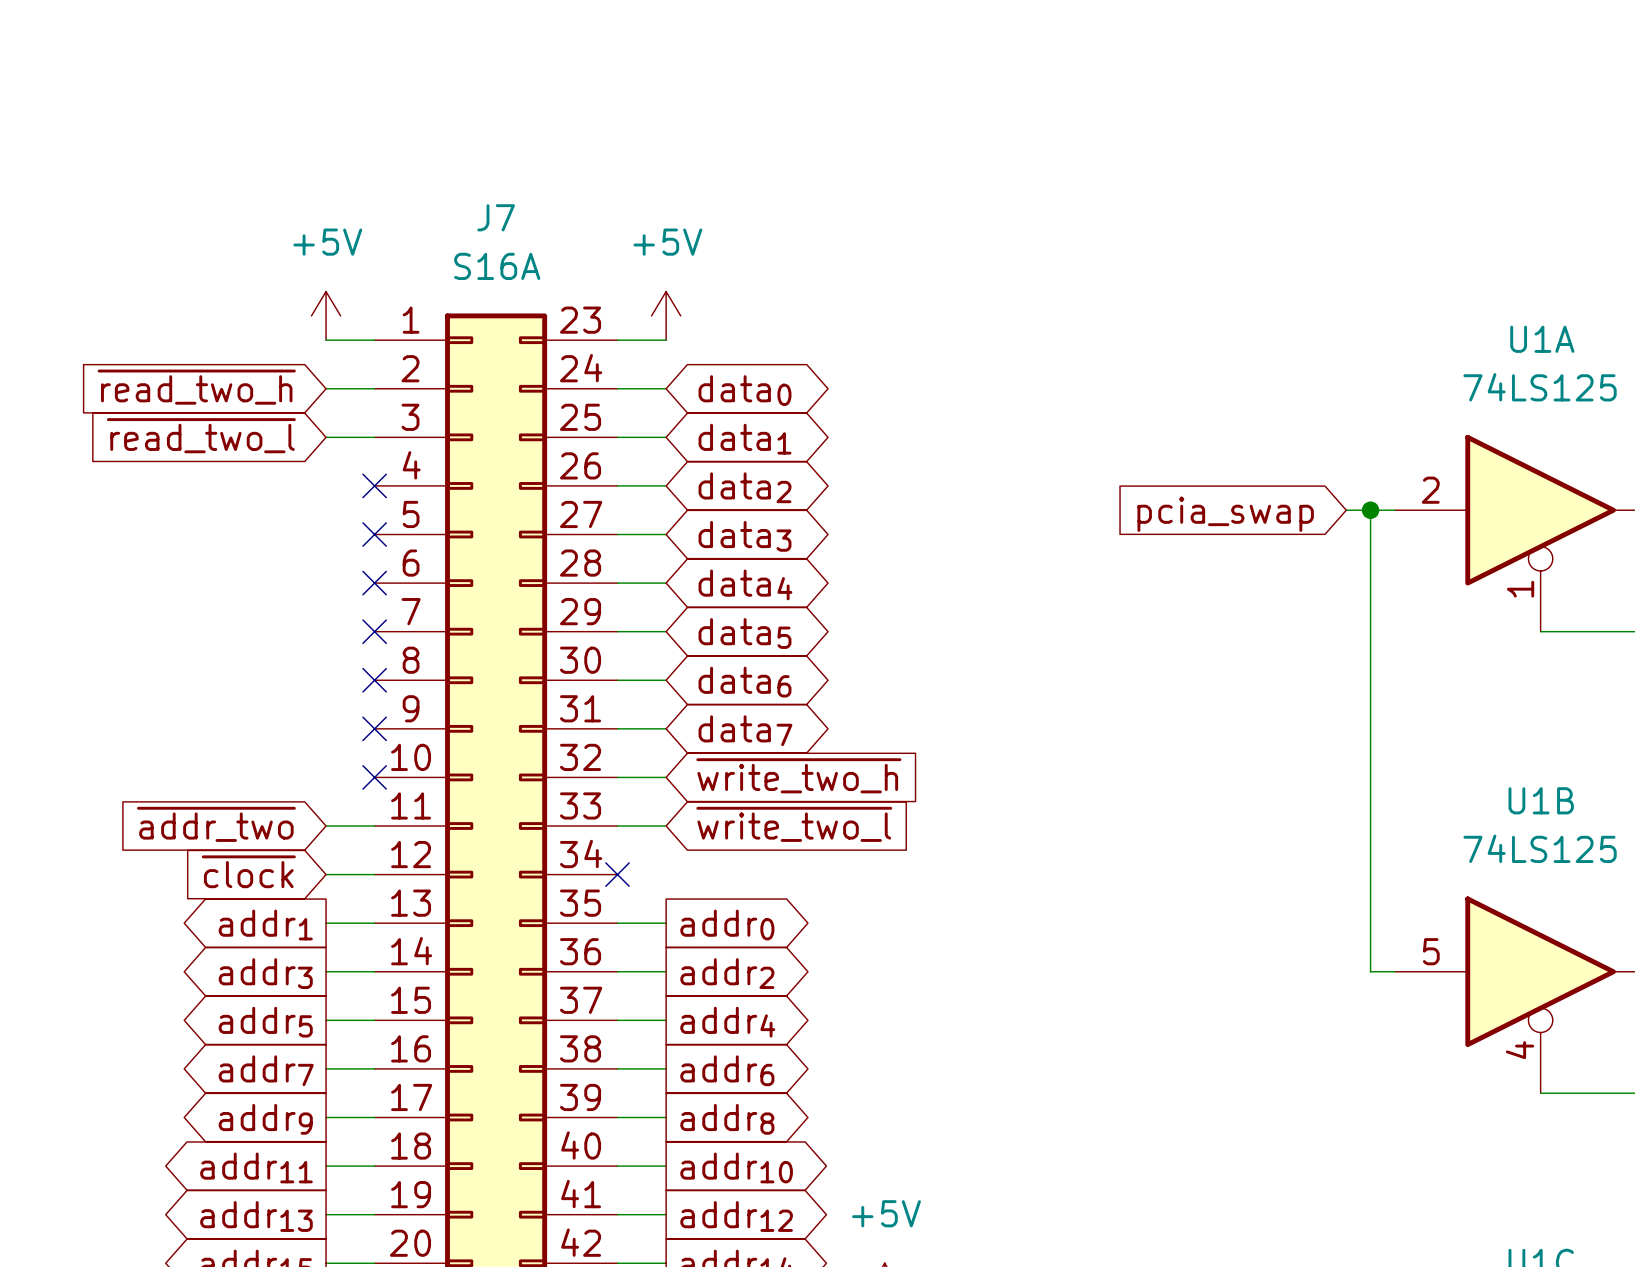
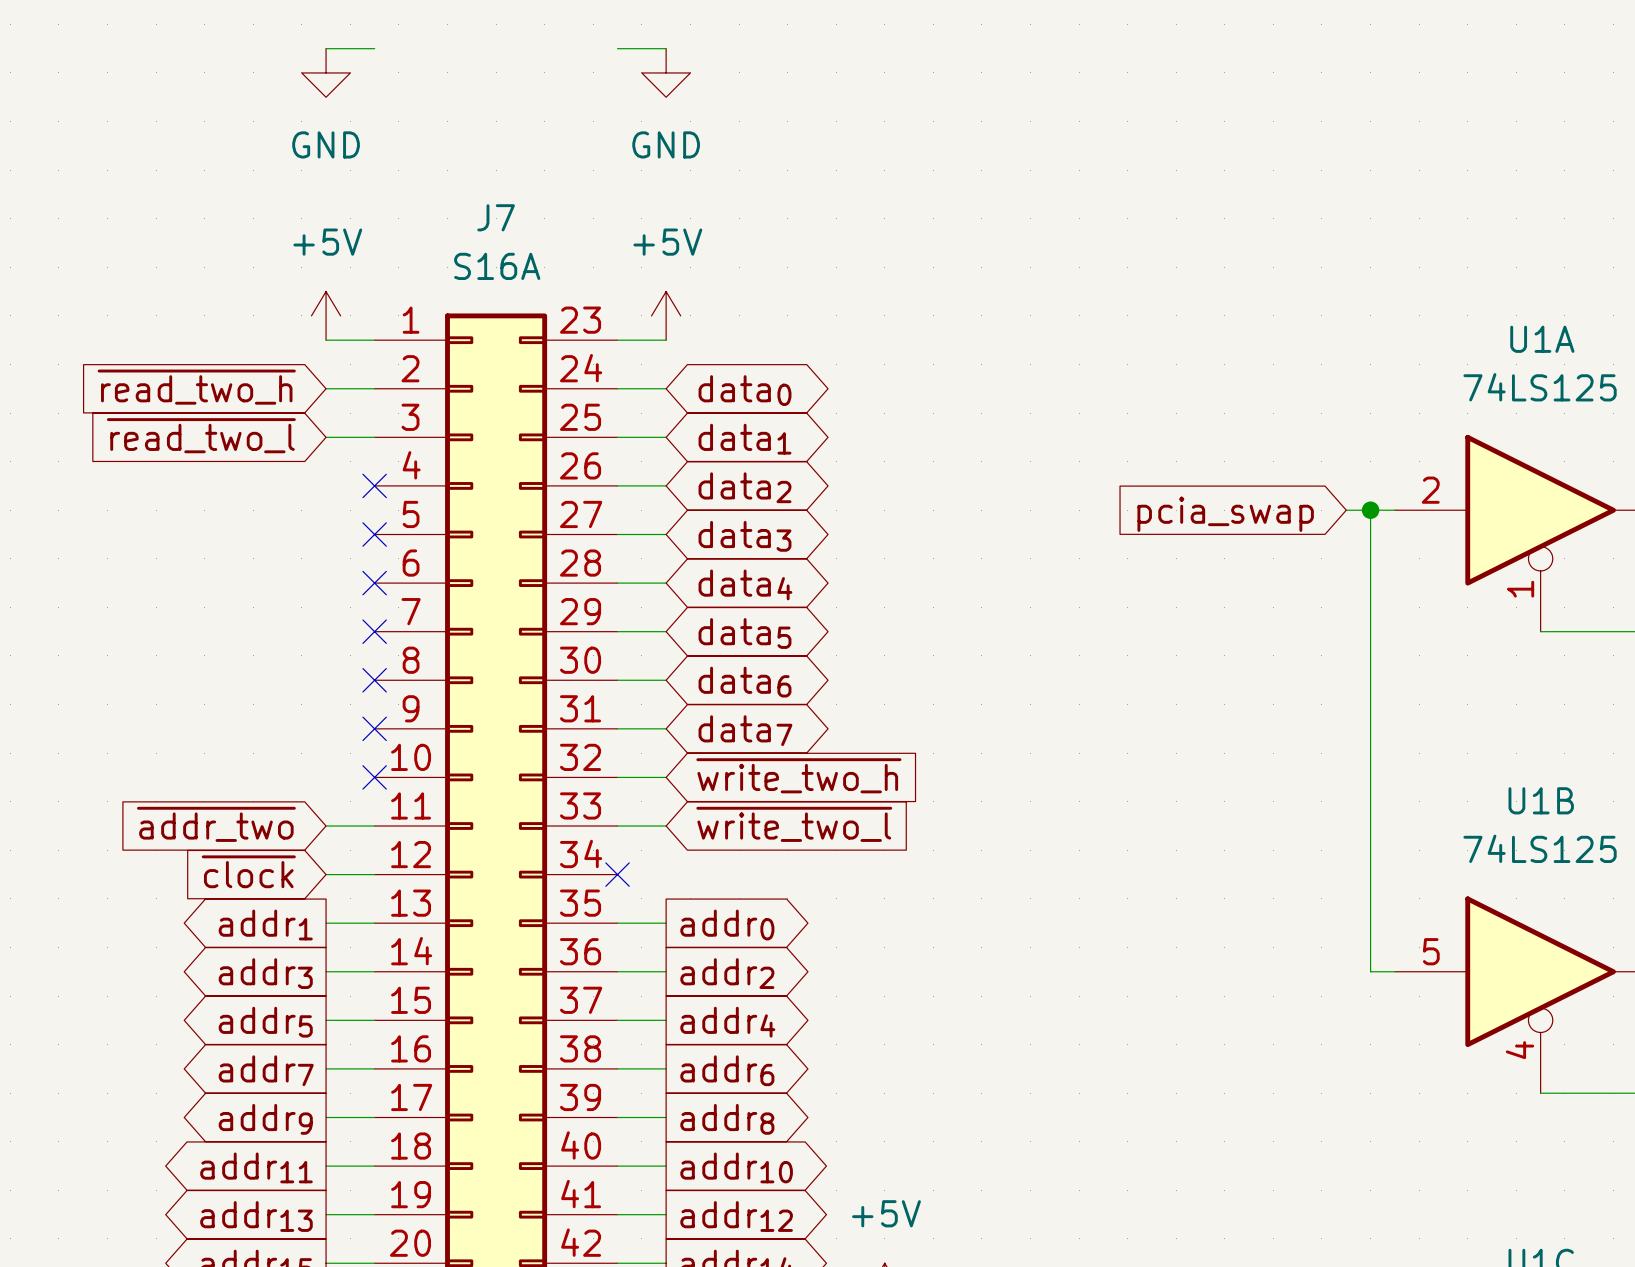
wire: none -> (326, 48) (374, 48)
wire: none -> (617, 48) (666, 48)
power symbol: none -> GND (326, 72)
power symbol: none -> GND (666, 72)

